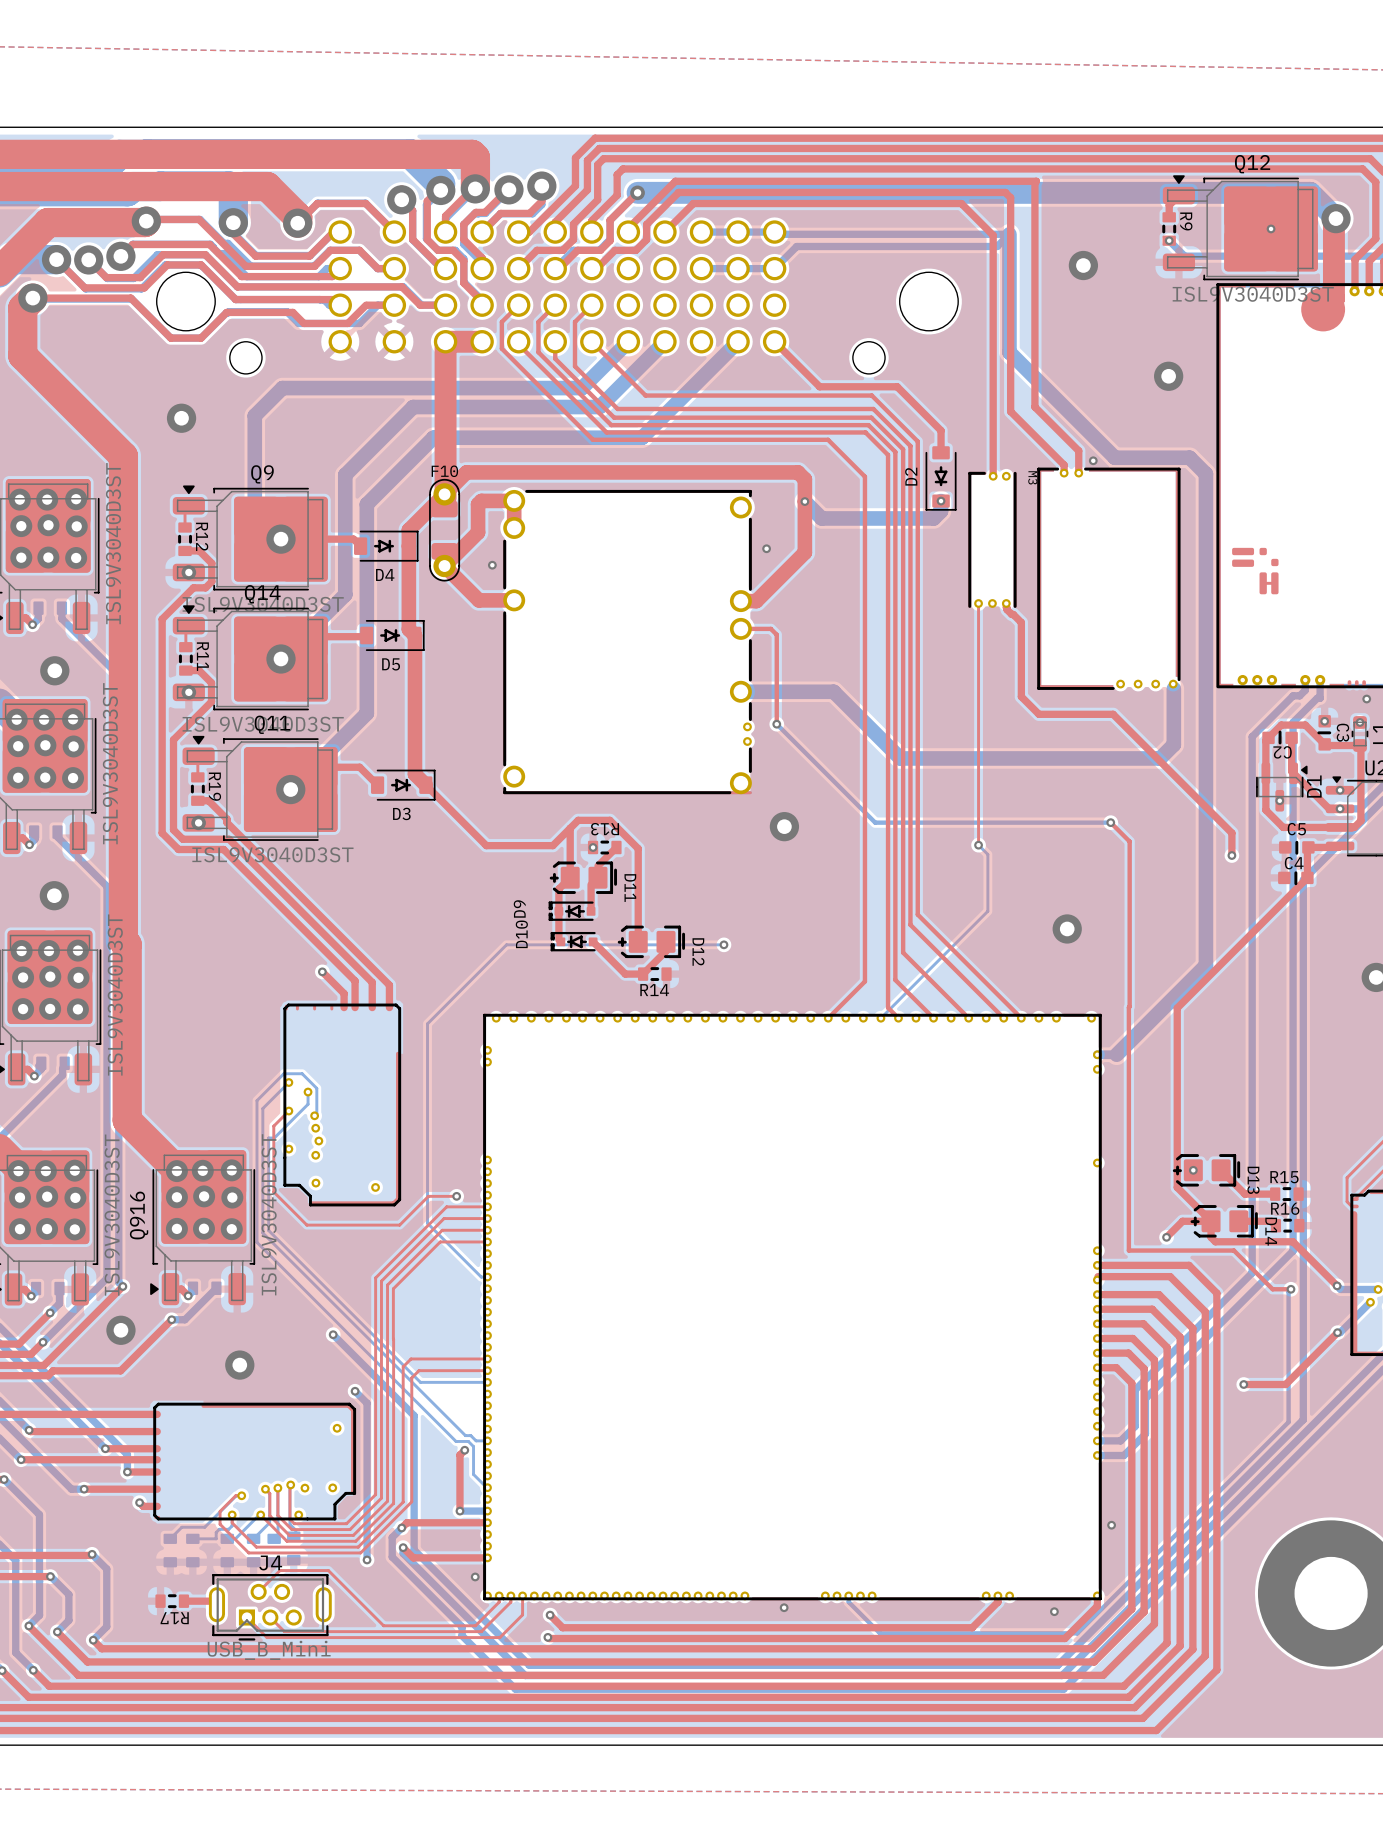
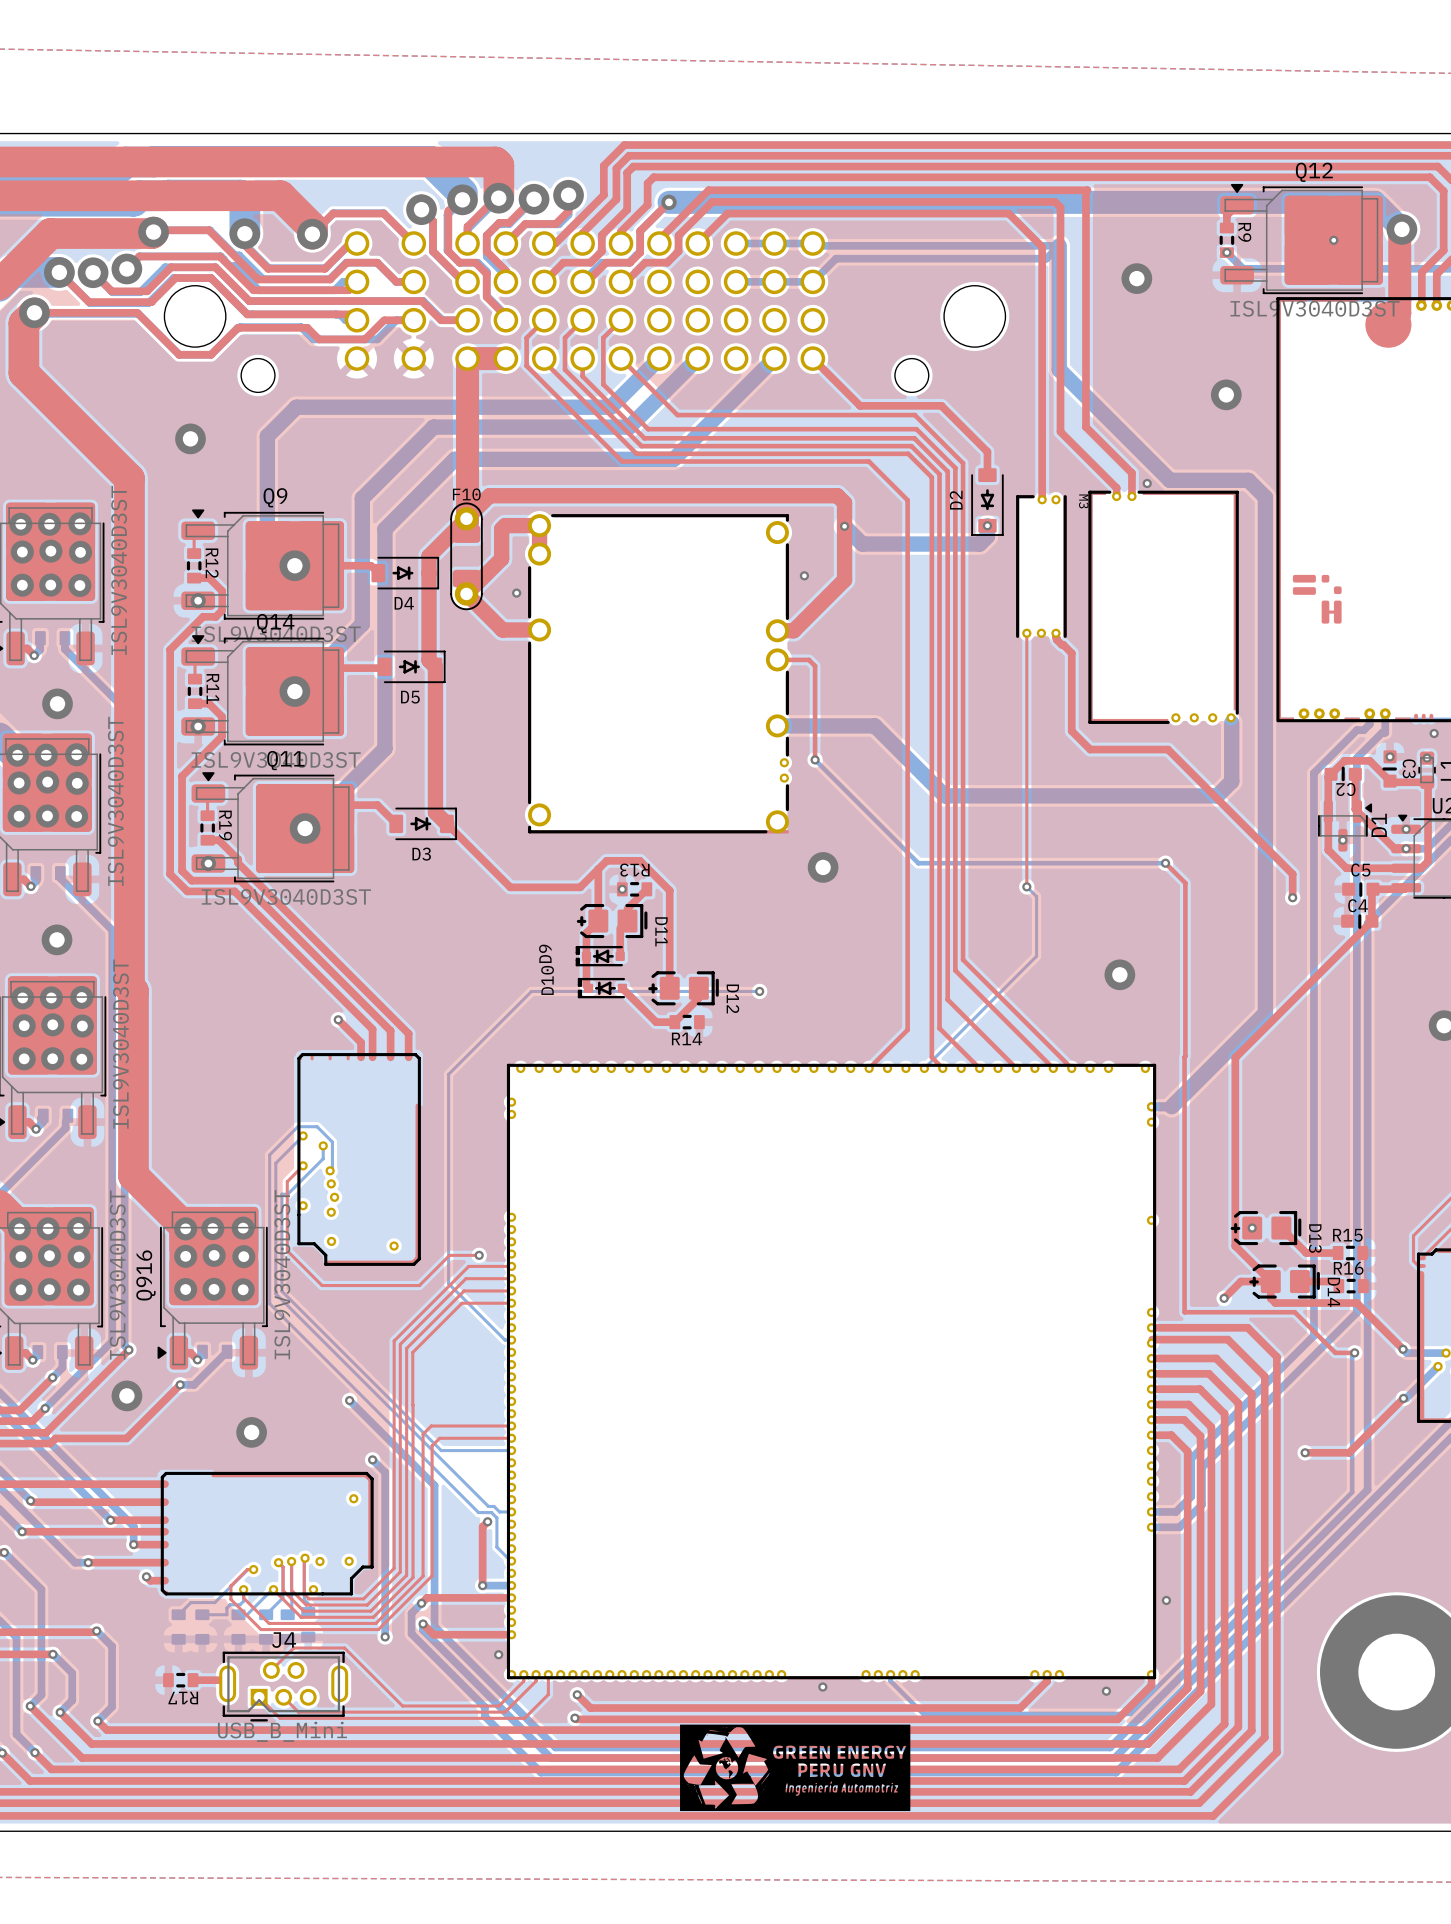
drawing: none -> [680, 1724, 911, 1812]

